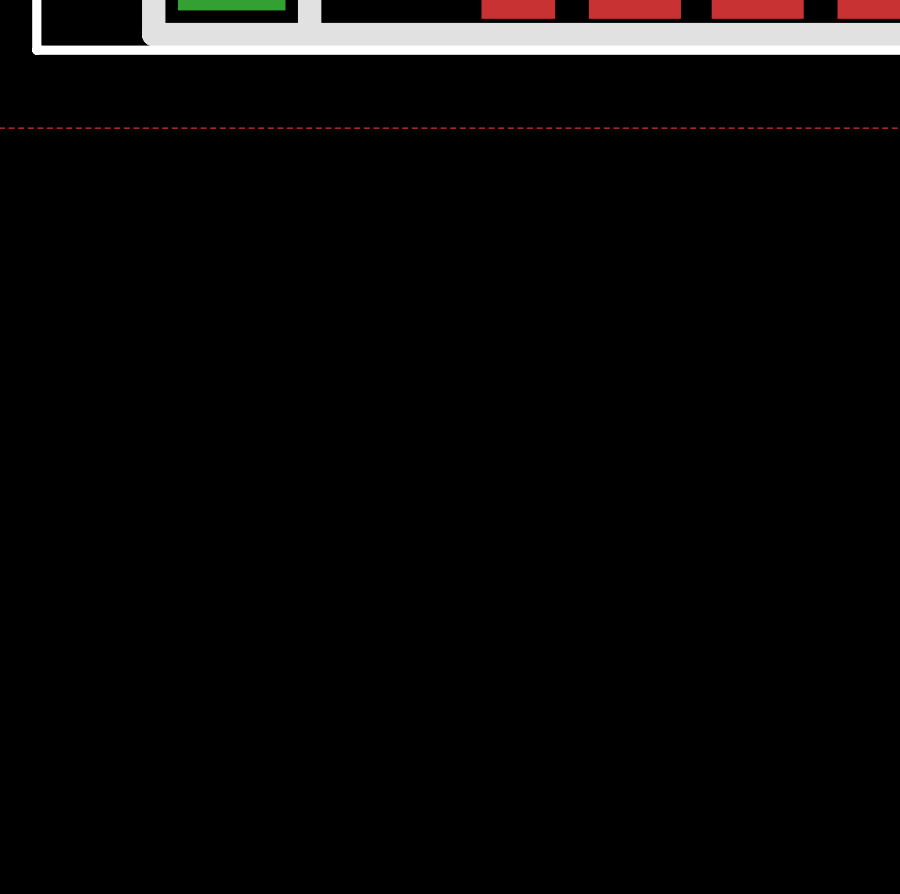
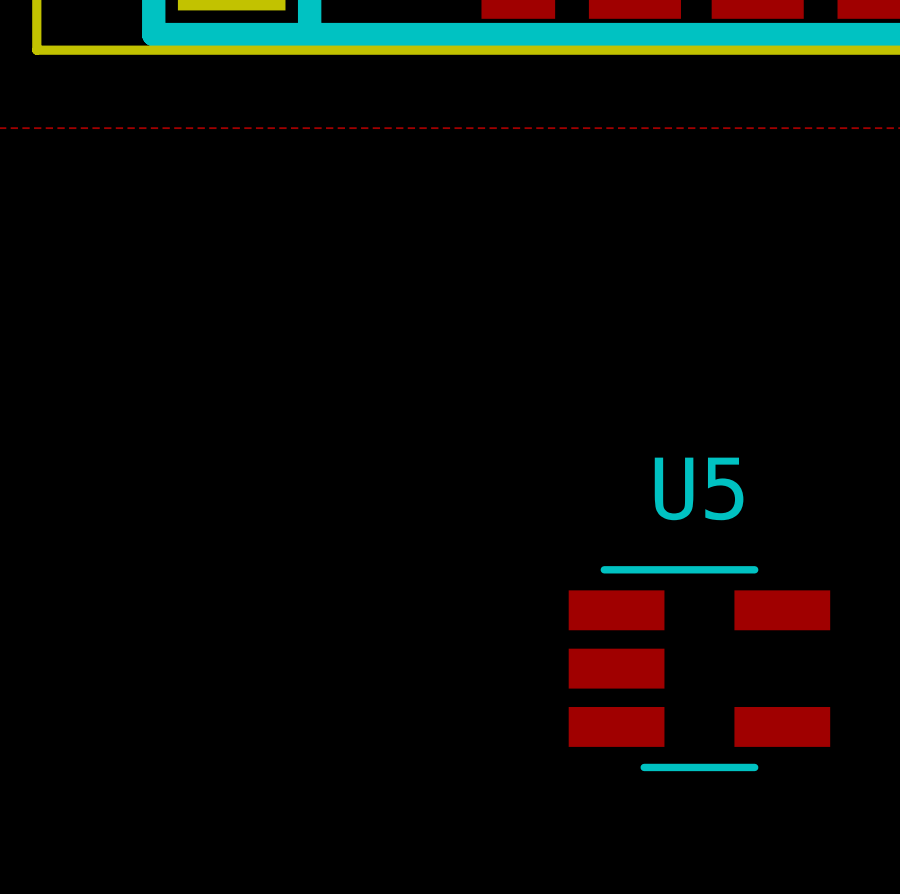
U5: none -> (699, 668)

